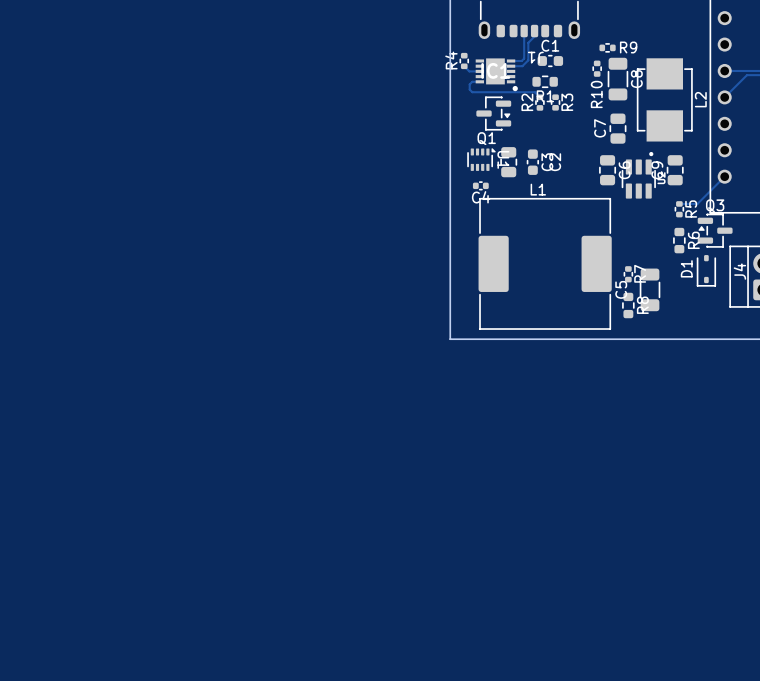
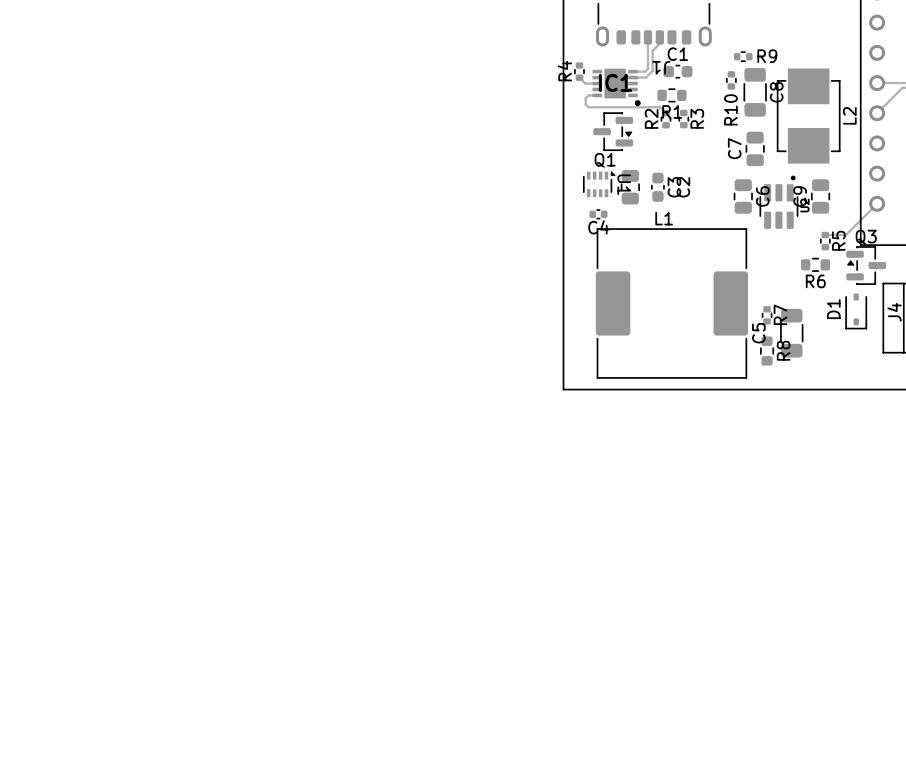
R6 rotation: 0° (679, 240) -> 90° clockwise (815, 264)

